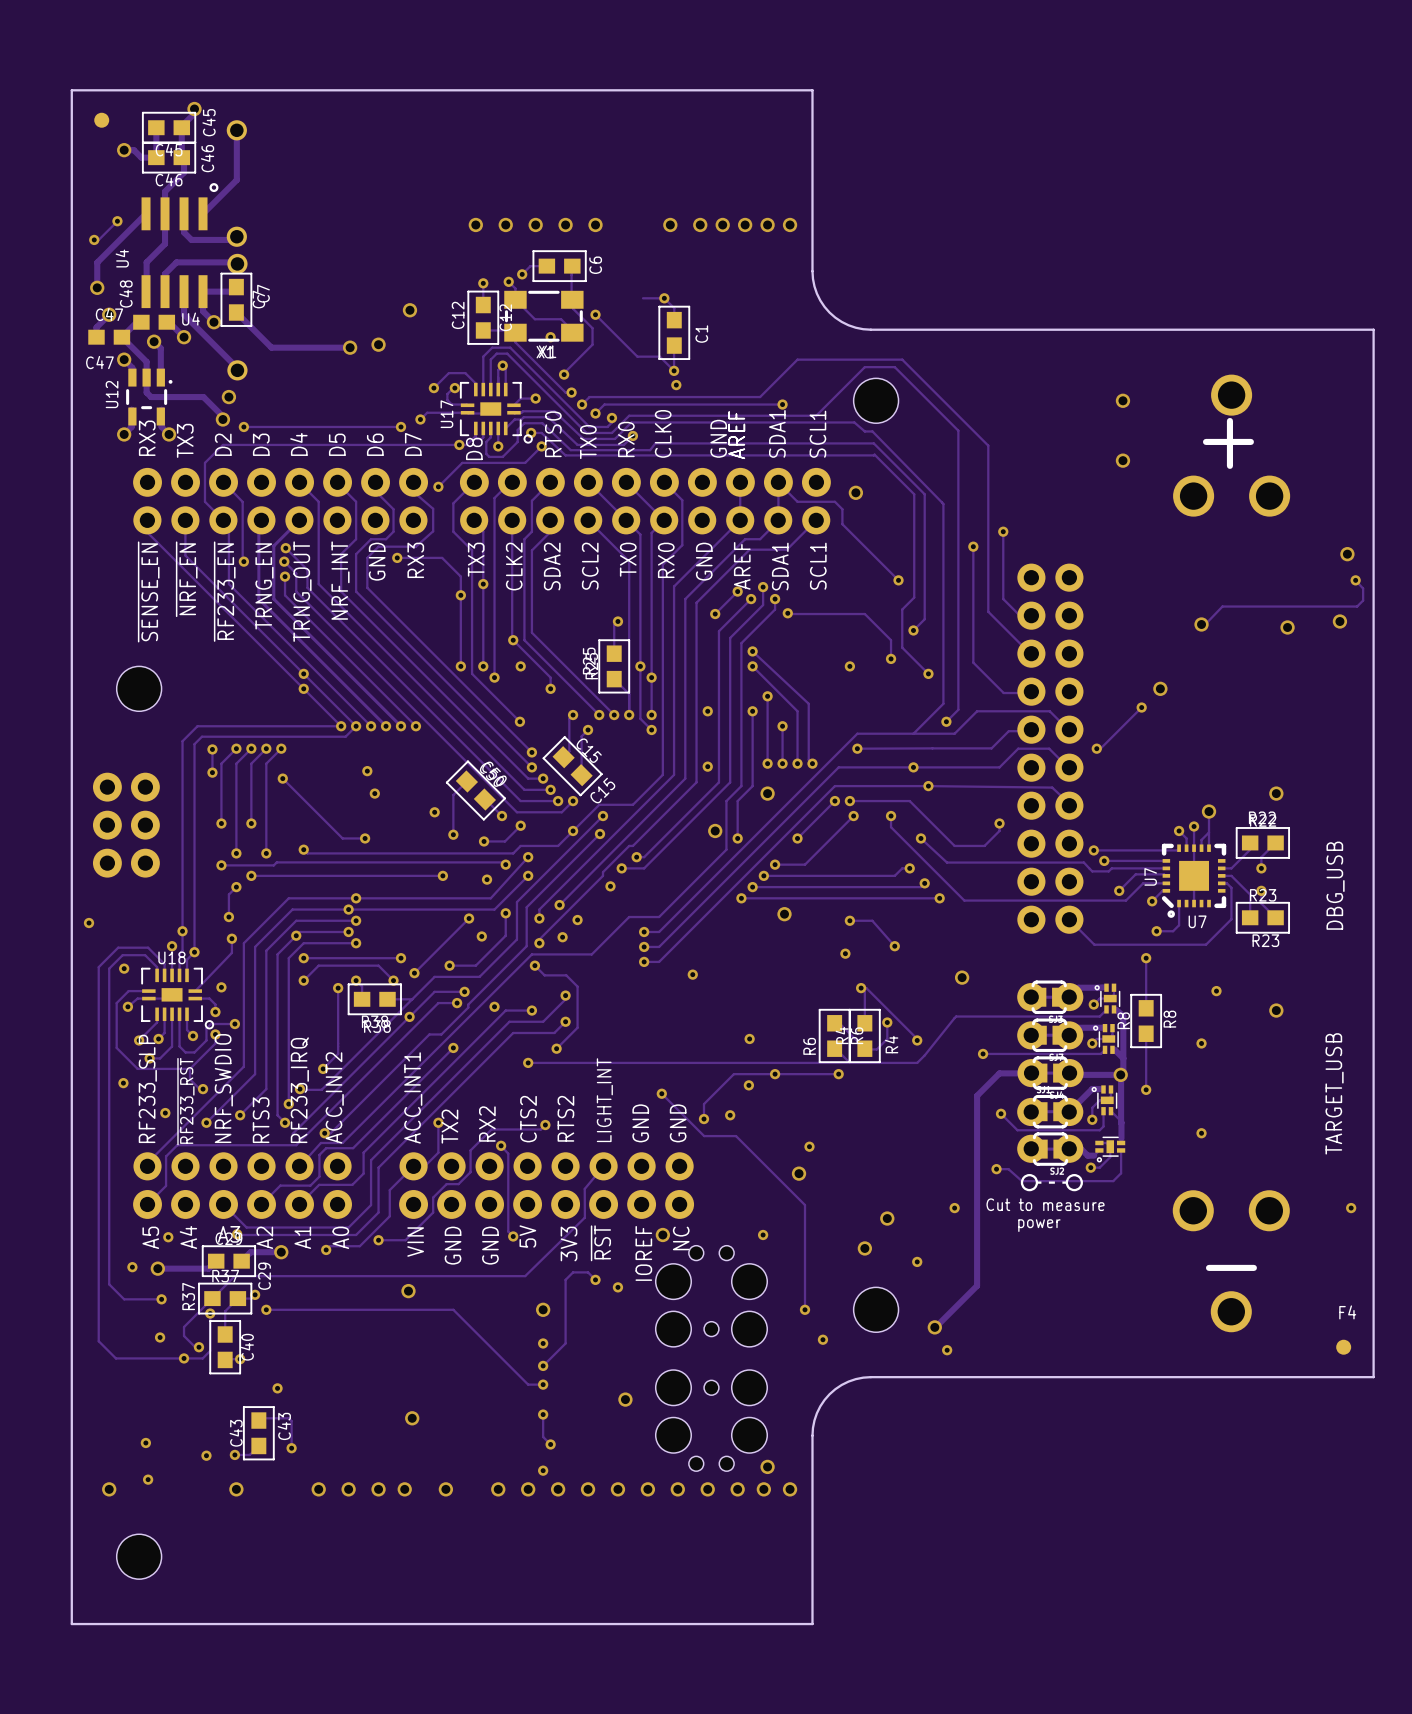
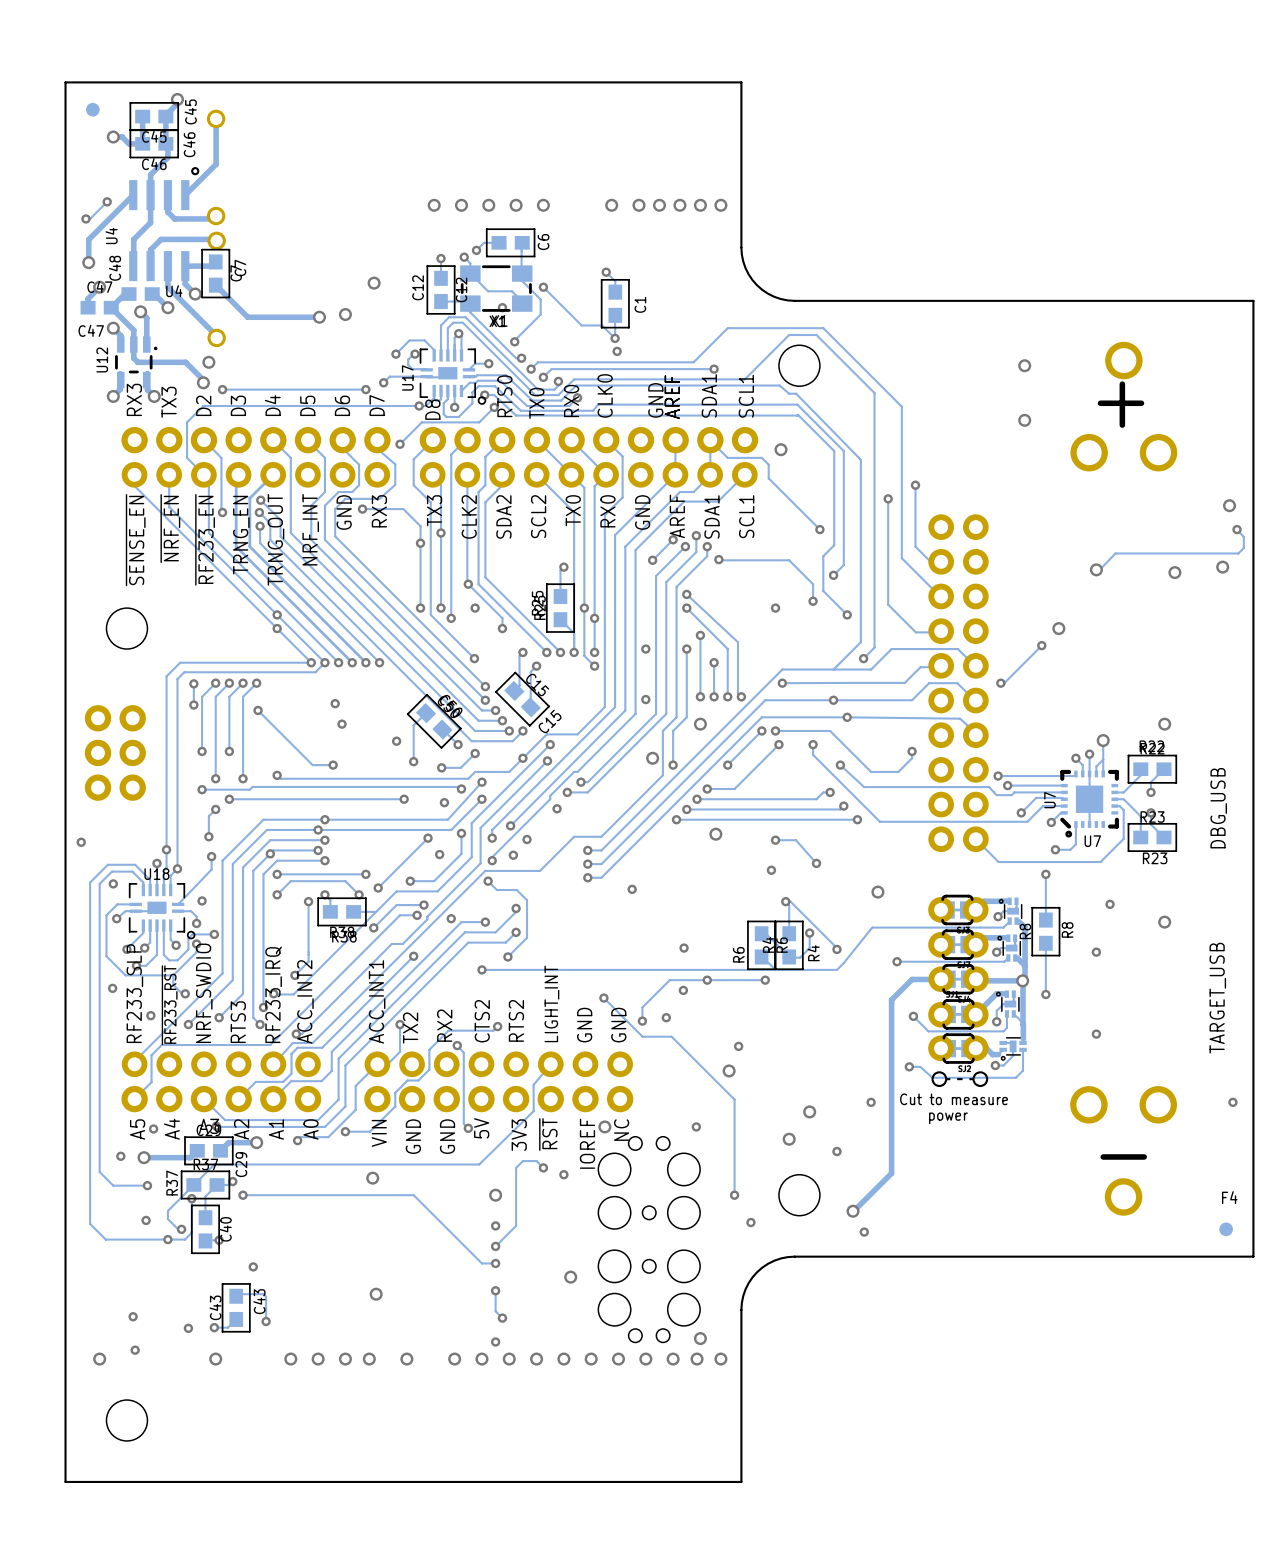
track: (664, 298) (643, 298) -> none
track: (409, 1016) (292, 1133) -> none

